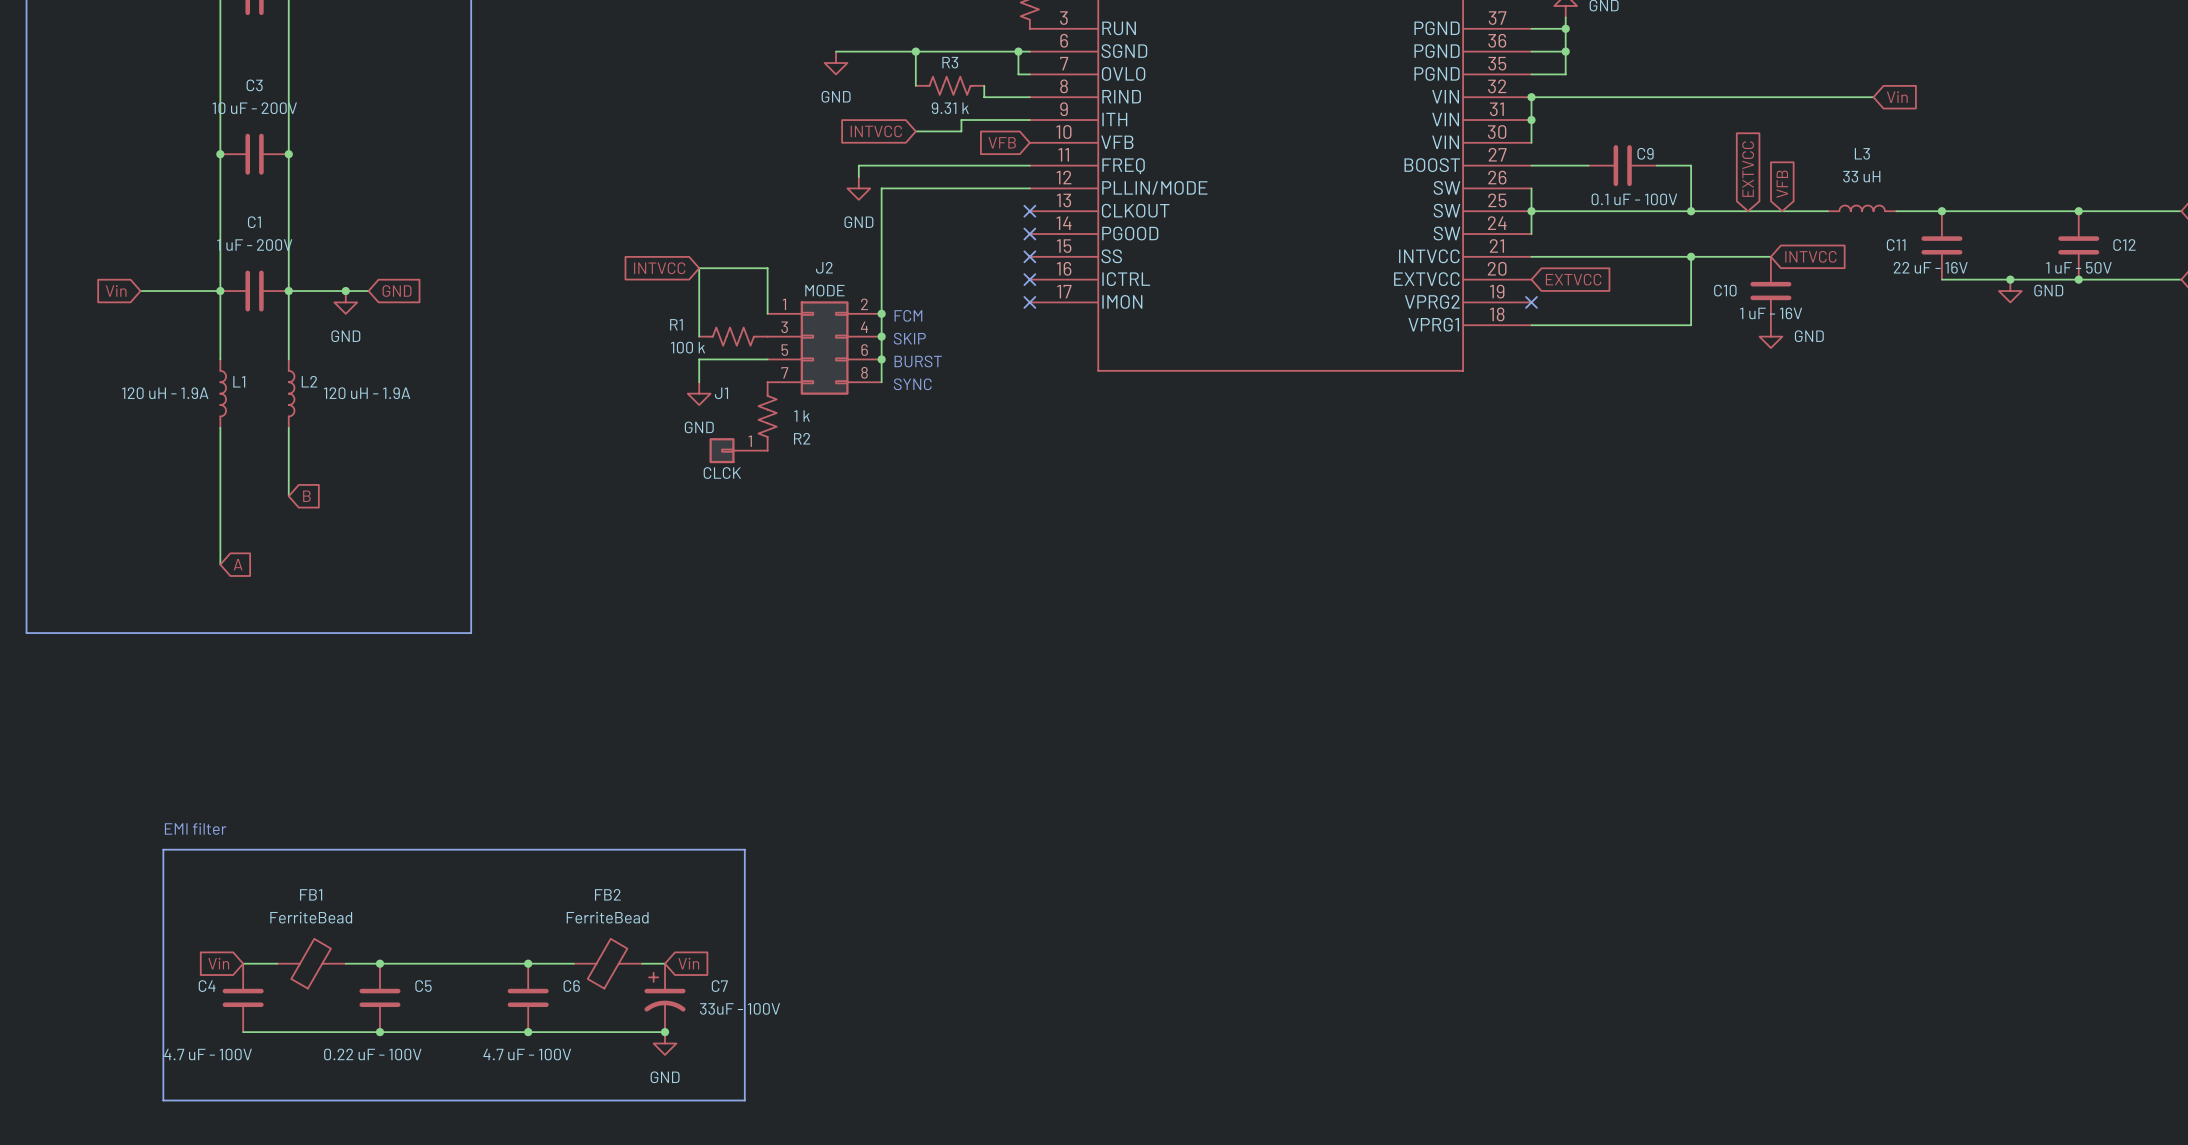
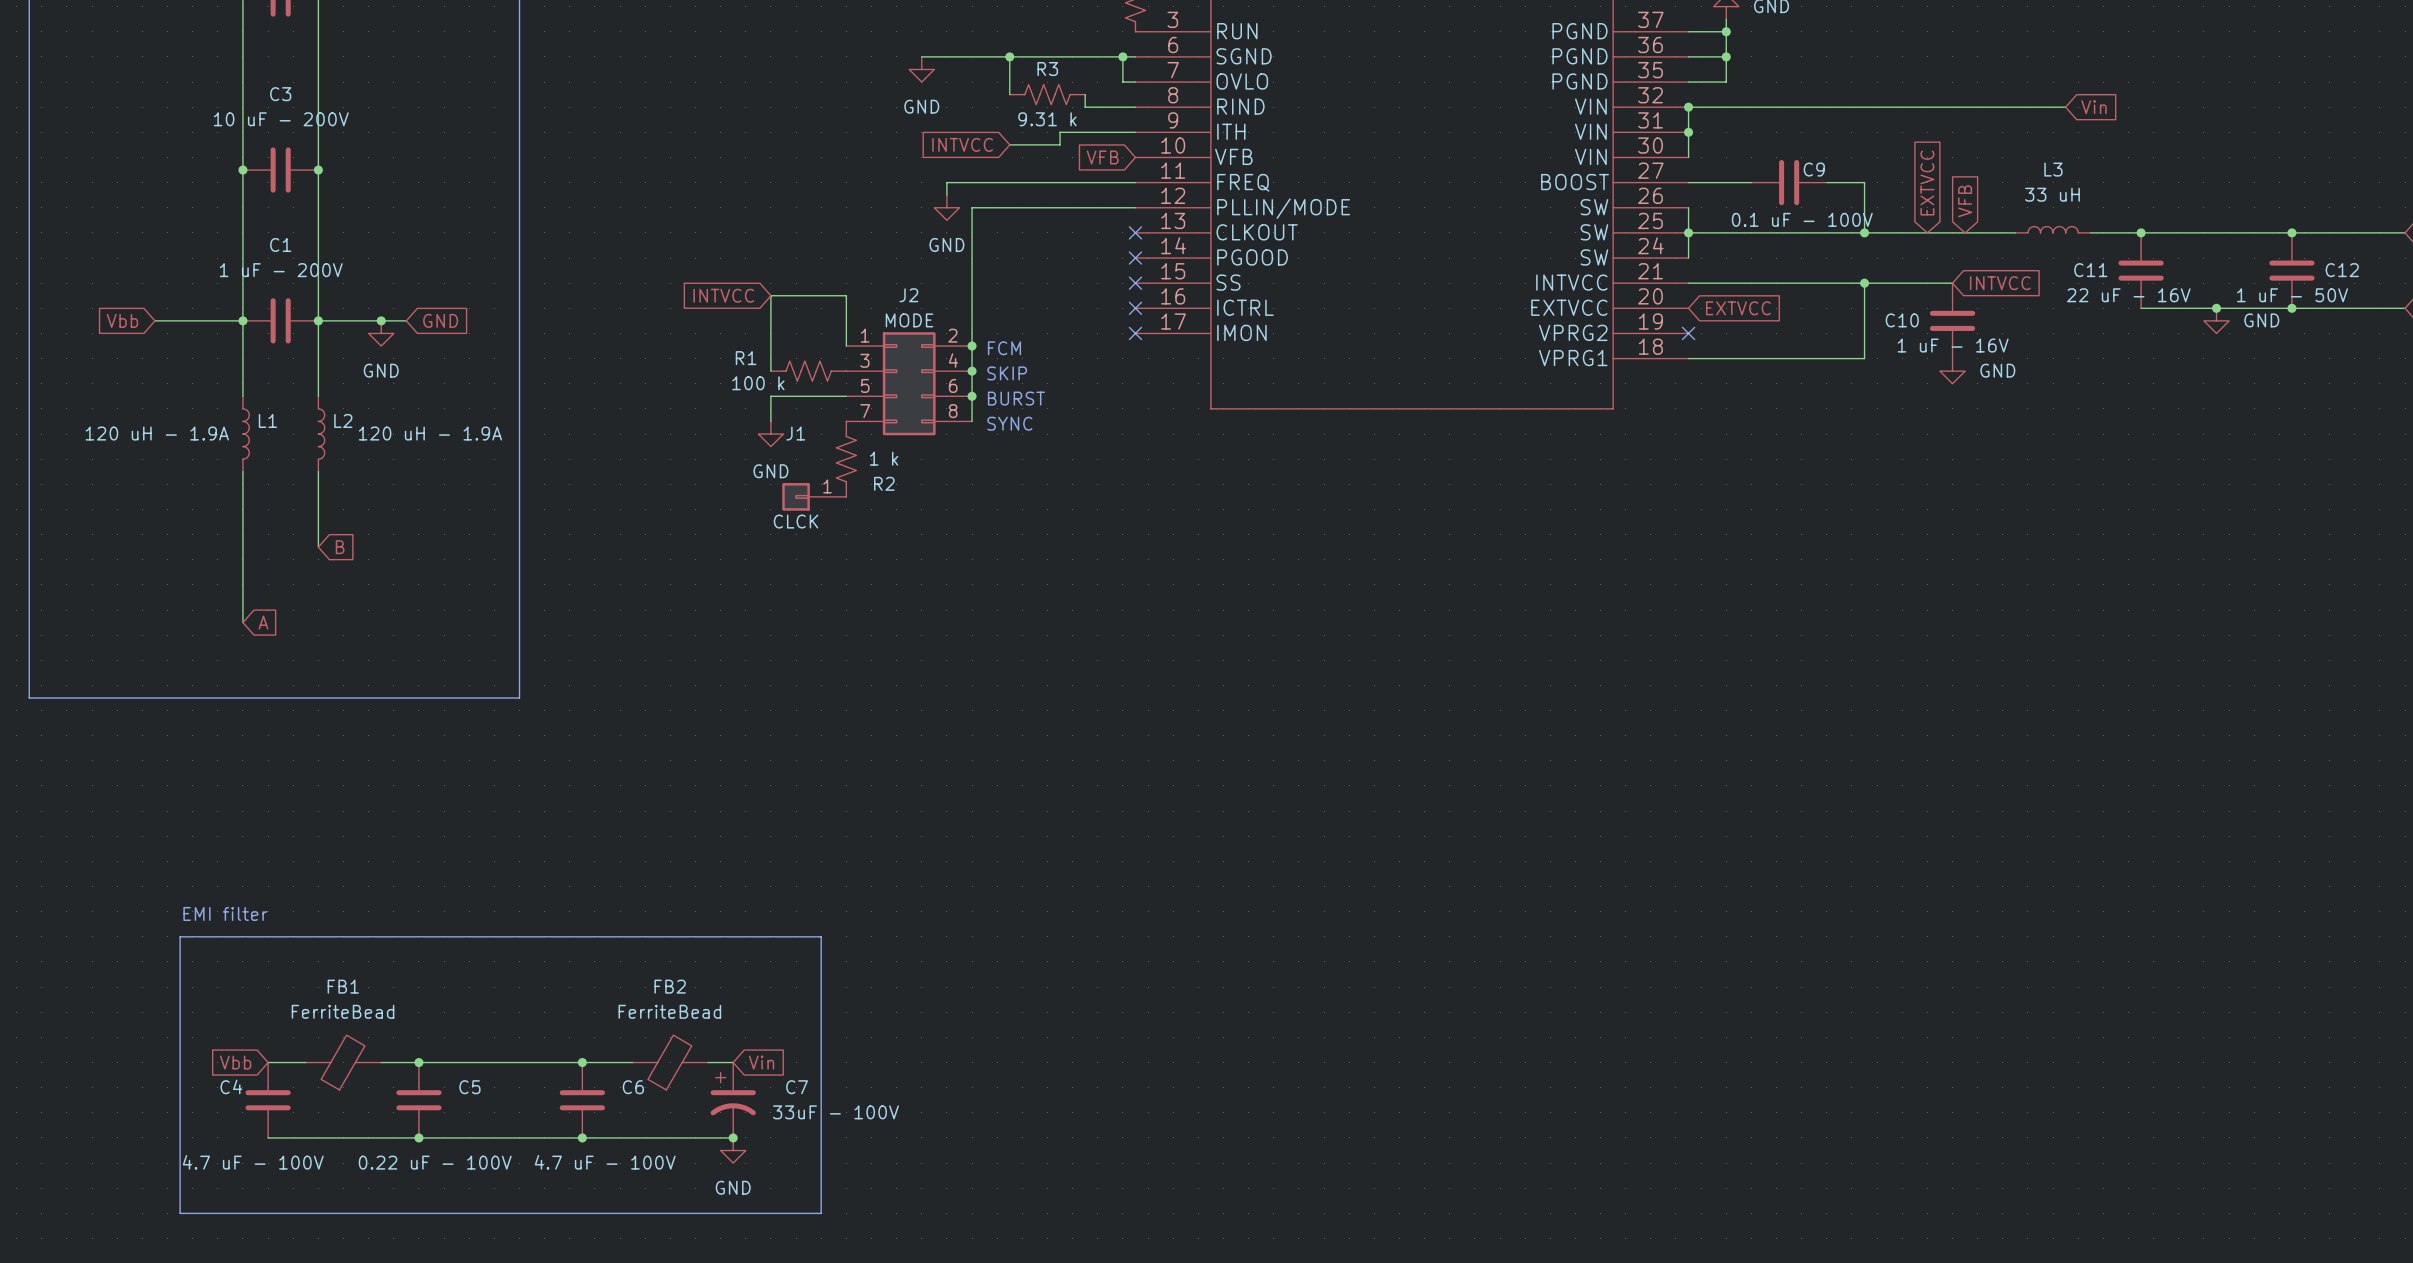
global label: Vin (116, 290) -> Vbb (122, 320)
global label: Vin (218, 963) -> Vbb (235, 1062)

